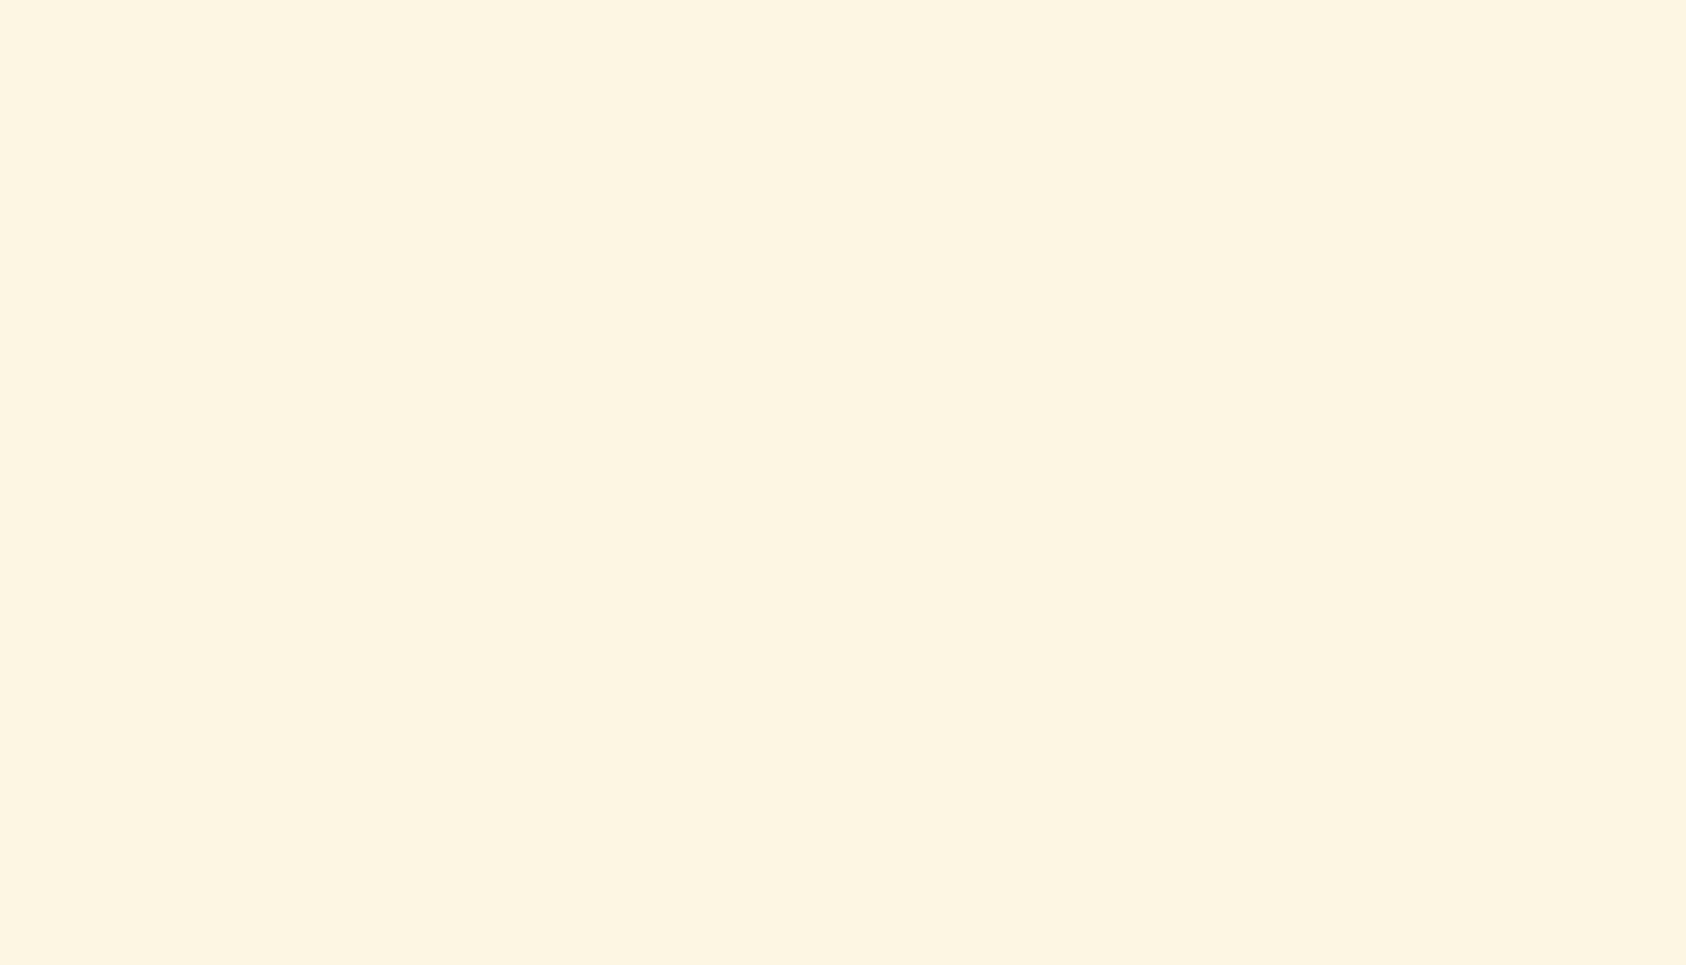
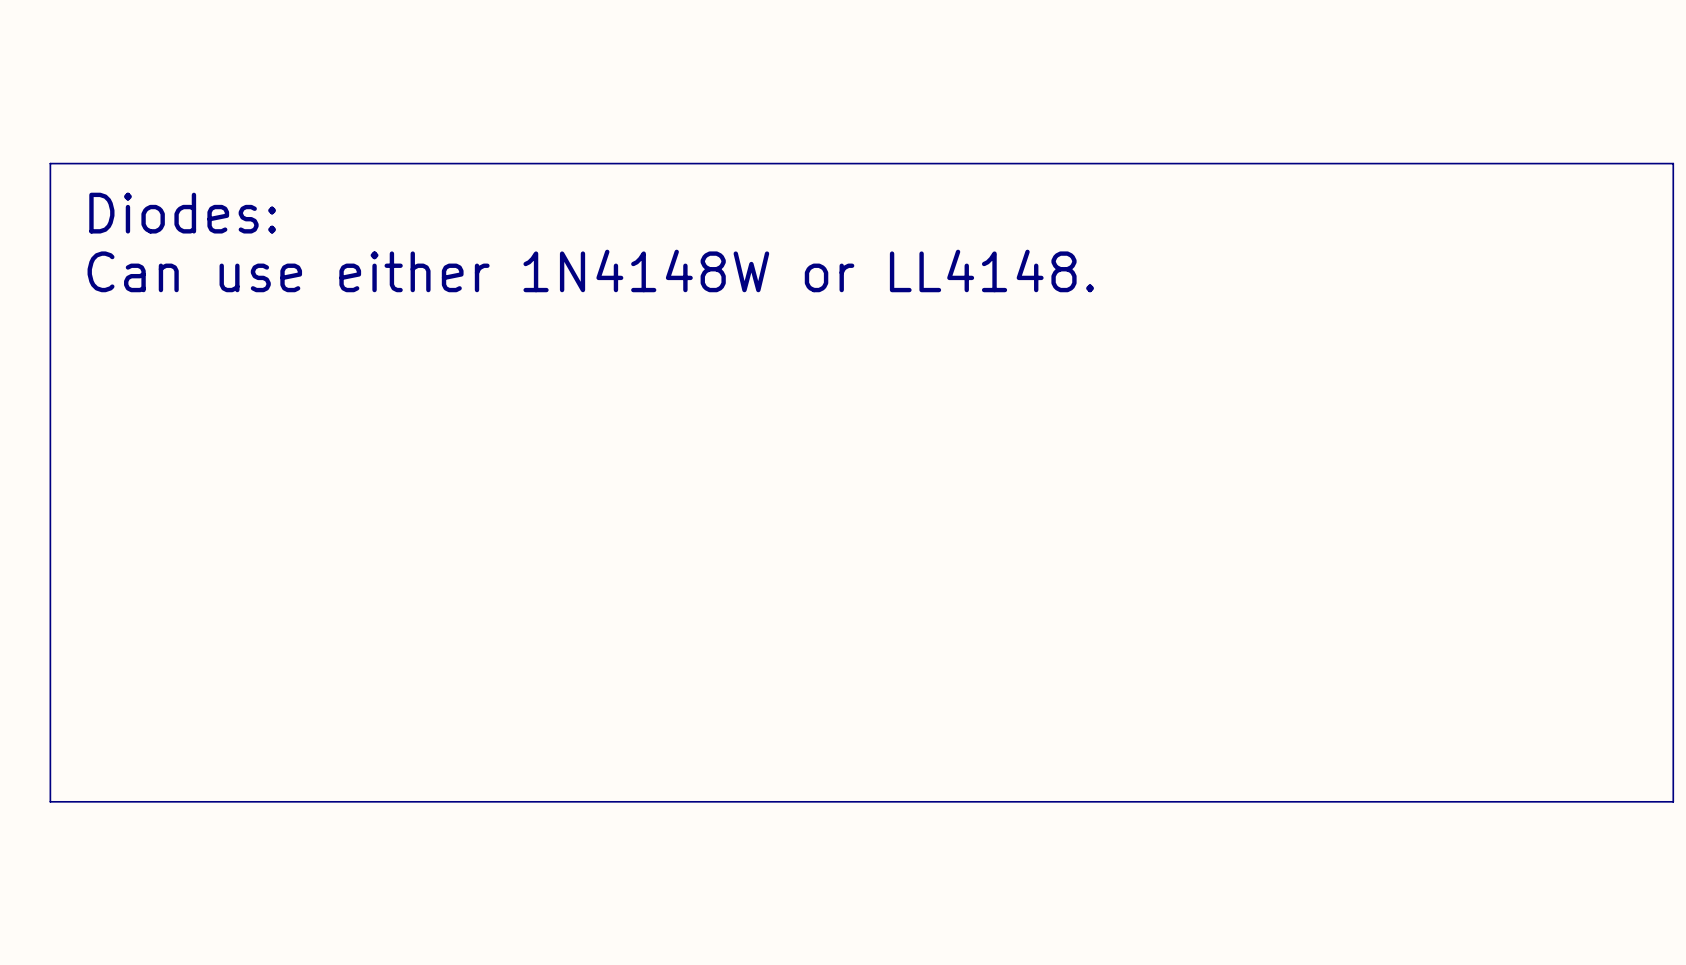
line: none -> (50, 163) (1673, 163) (1673, 801) (50, 801) (50, 163)
text: none -> Diodes: (182, 213)
text: none -> Can use either 1N4148W or LL4148. (590, 270)

